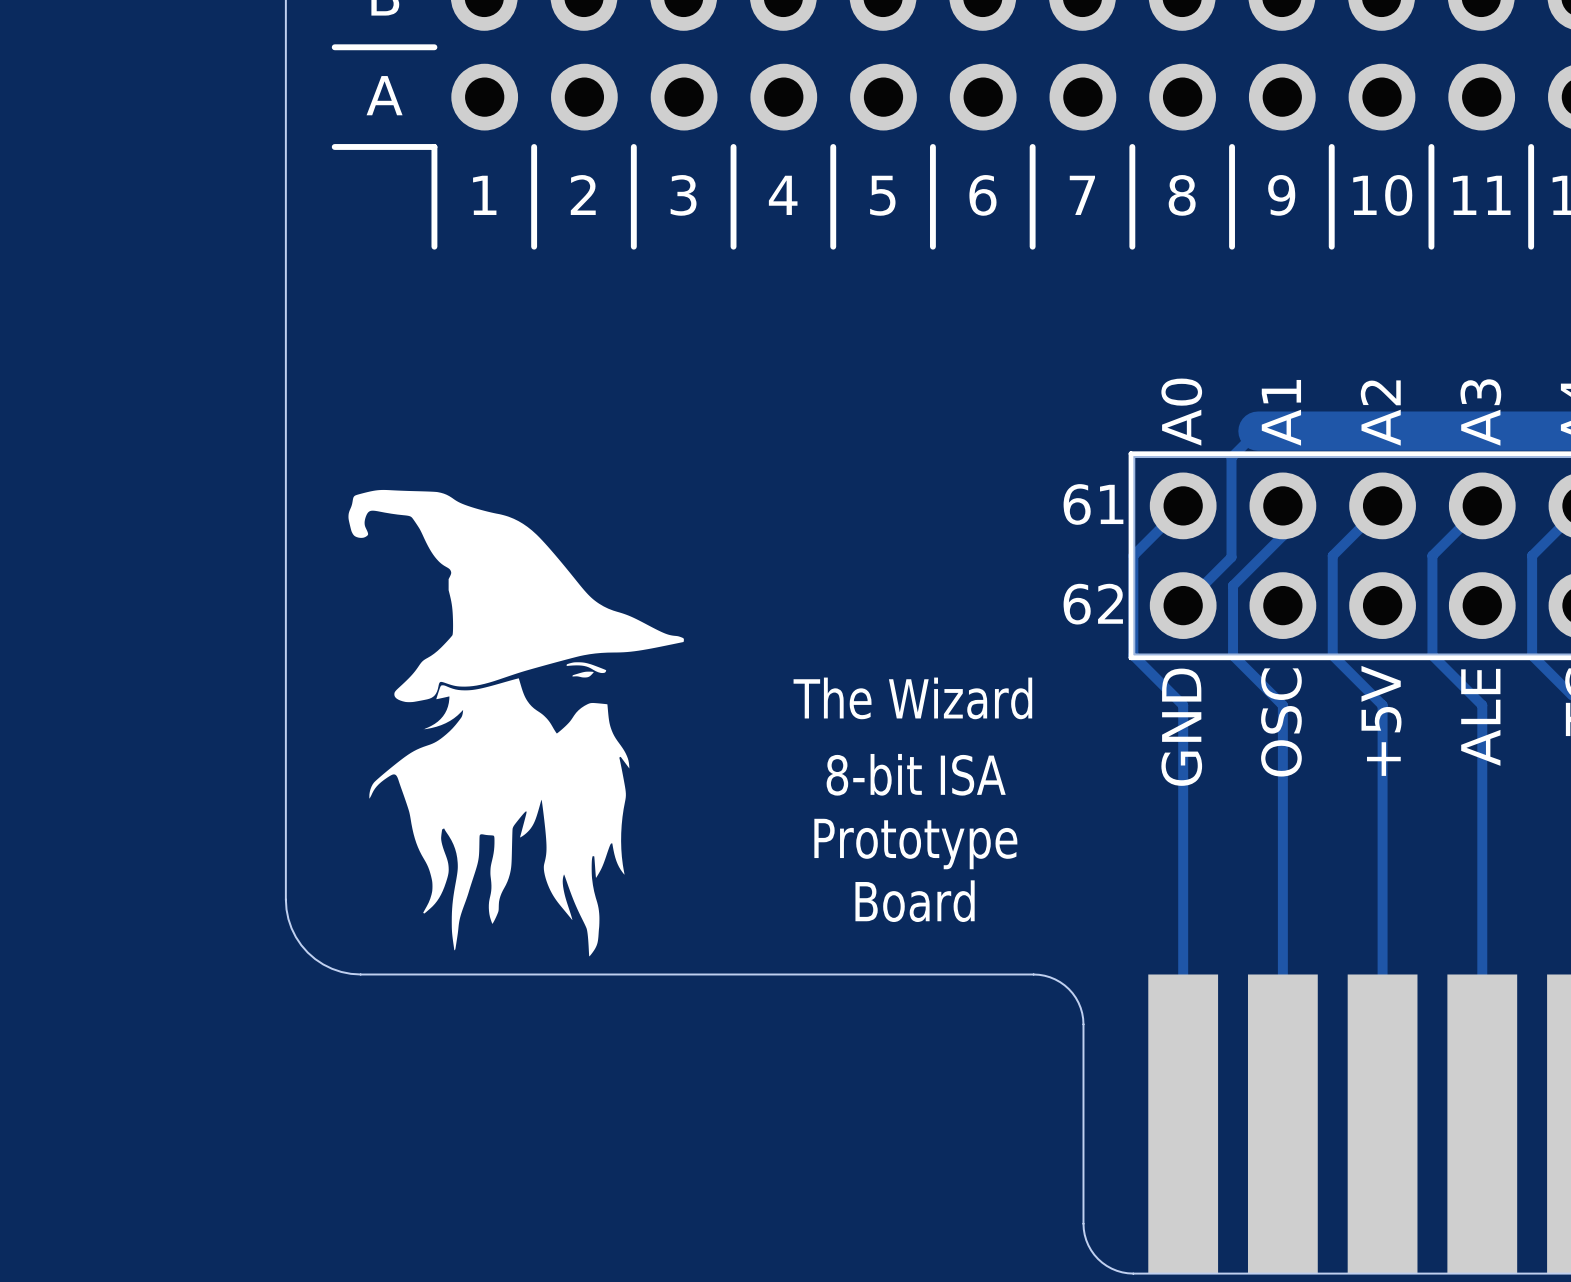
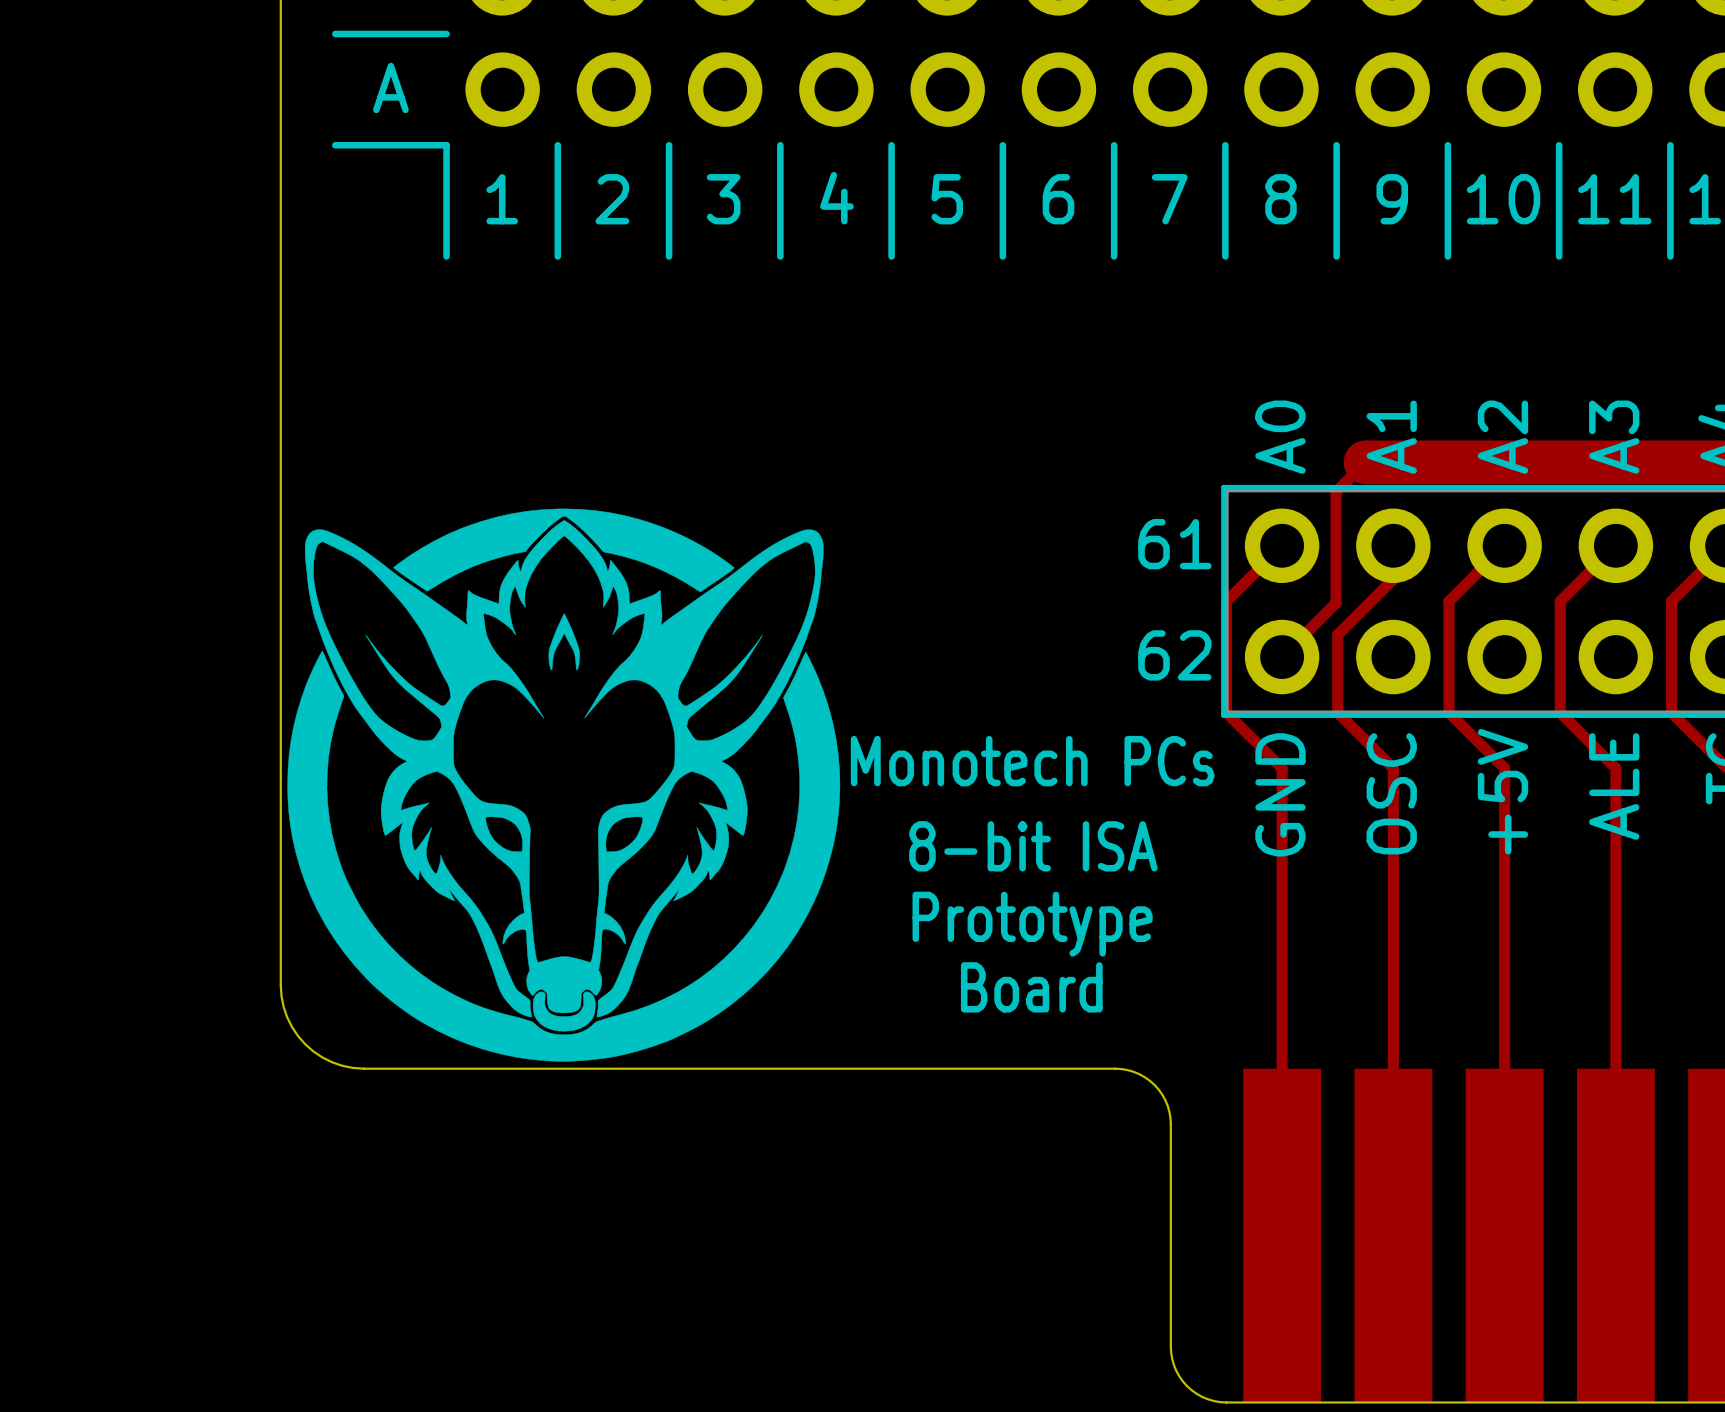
drawing shape: [348, 489, 684, 957] -> [287, 508, 841, 1062]
text: The Wizard (912, 698) -> none
text: none -> Monotech PCs (1032, 761)
text position: 8-bit ISA (916, 774) -> 8-bit ISA (1033, 846)
text position: Prototype (915, 844) -> Prototype (1032, 924)
text position: Board (915, 901) -> Board (1031, 987)

